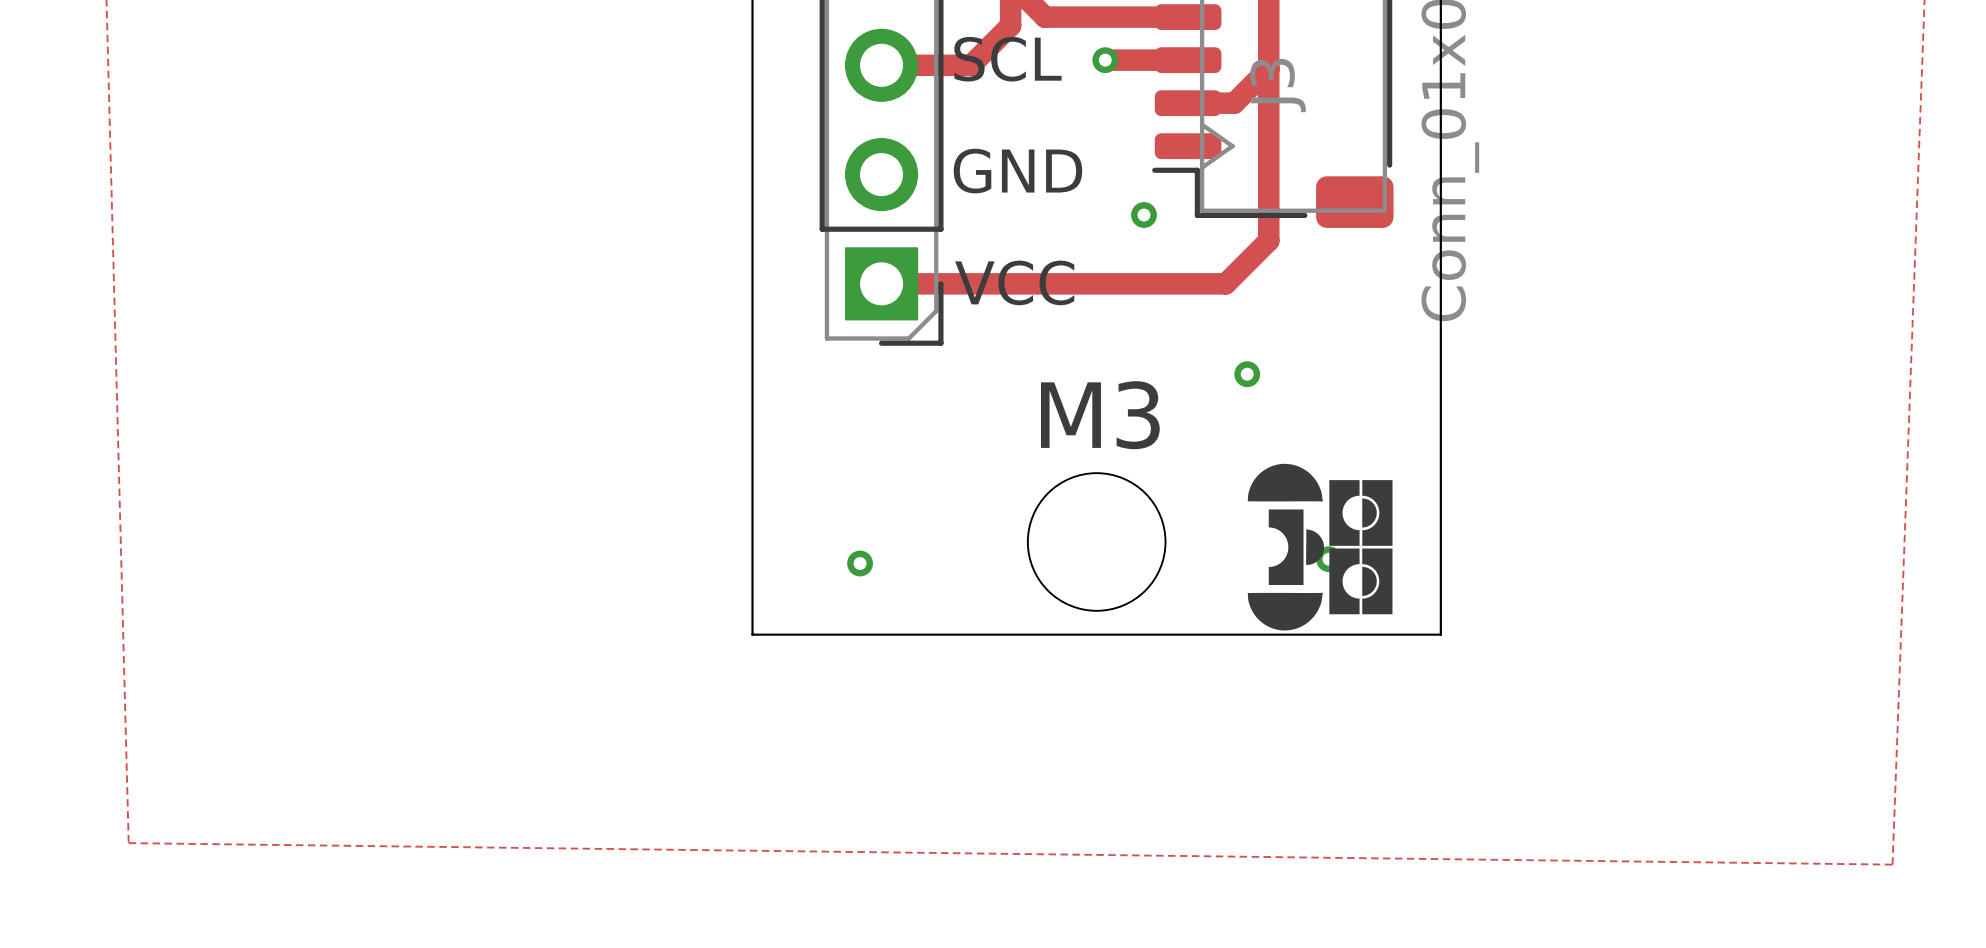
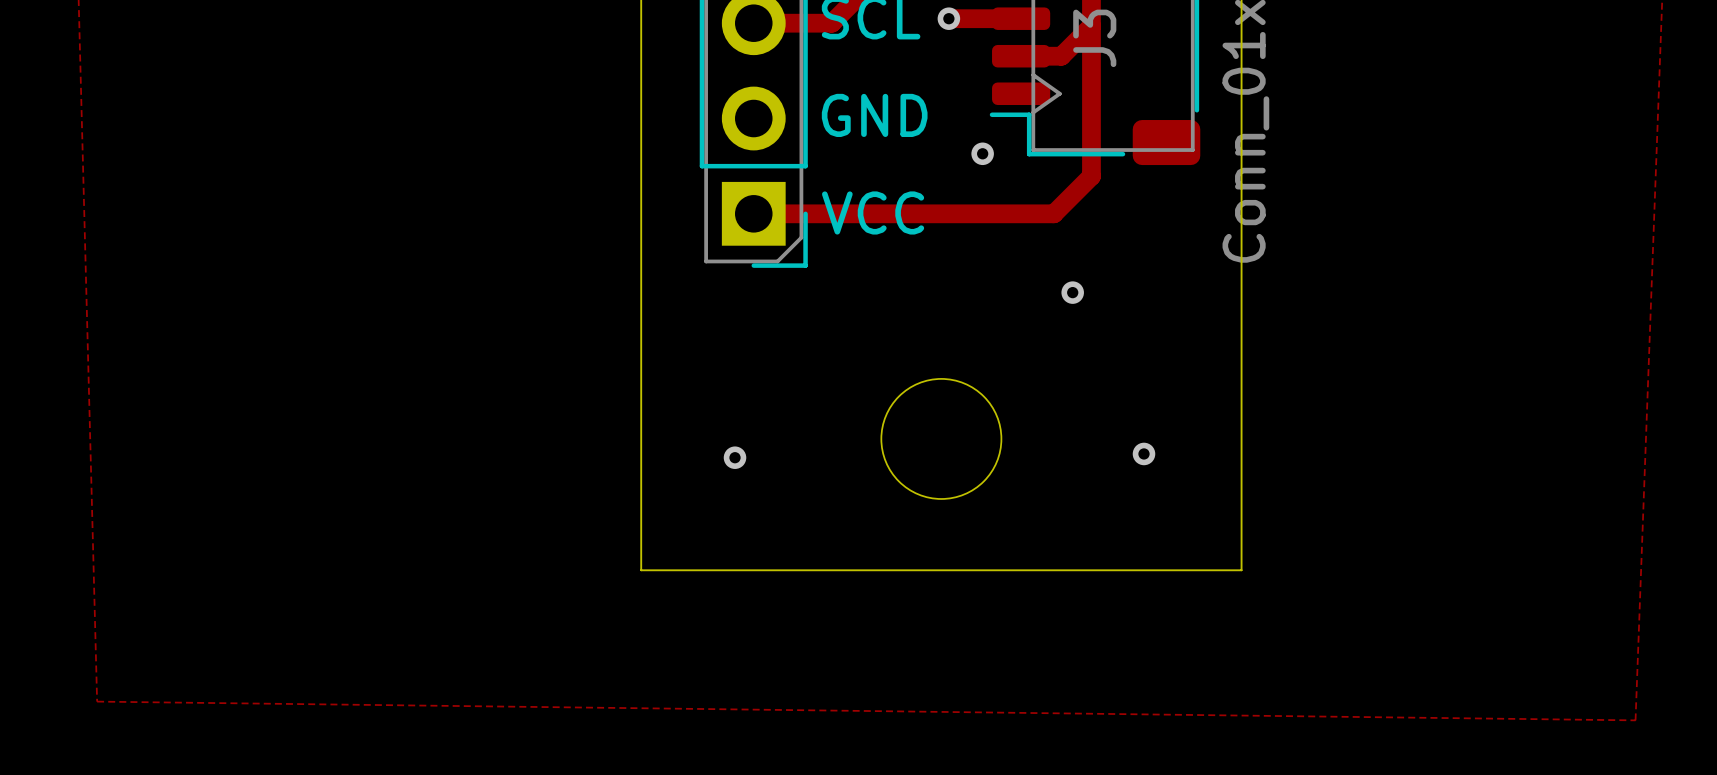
text: M3 (1100, 415) -> none
drawing: [1247, 463, 1393, 631] -> none
board edge: (752, 634) (1440, 634) -> (641, 519) (641, 570) (1241, 570) (1241, 519)

